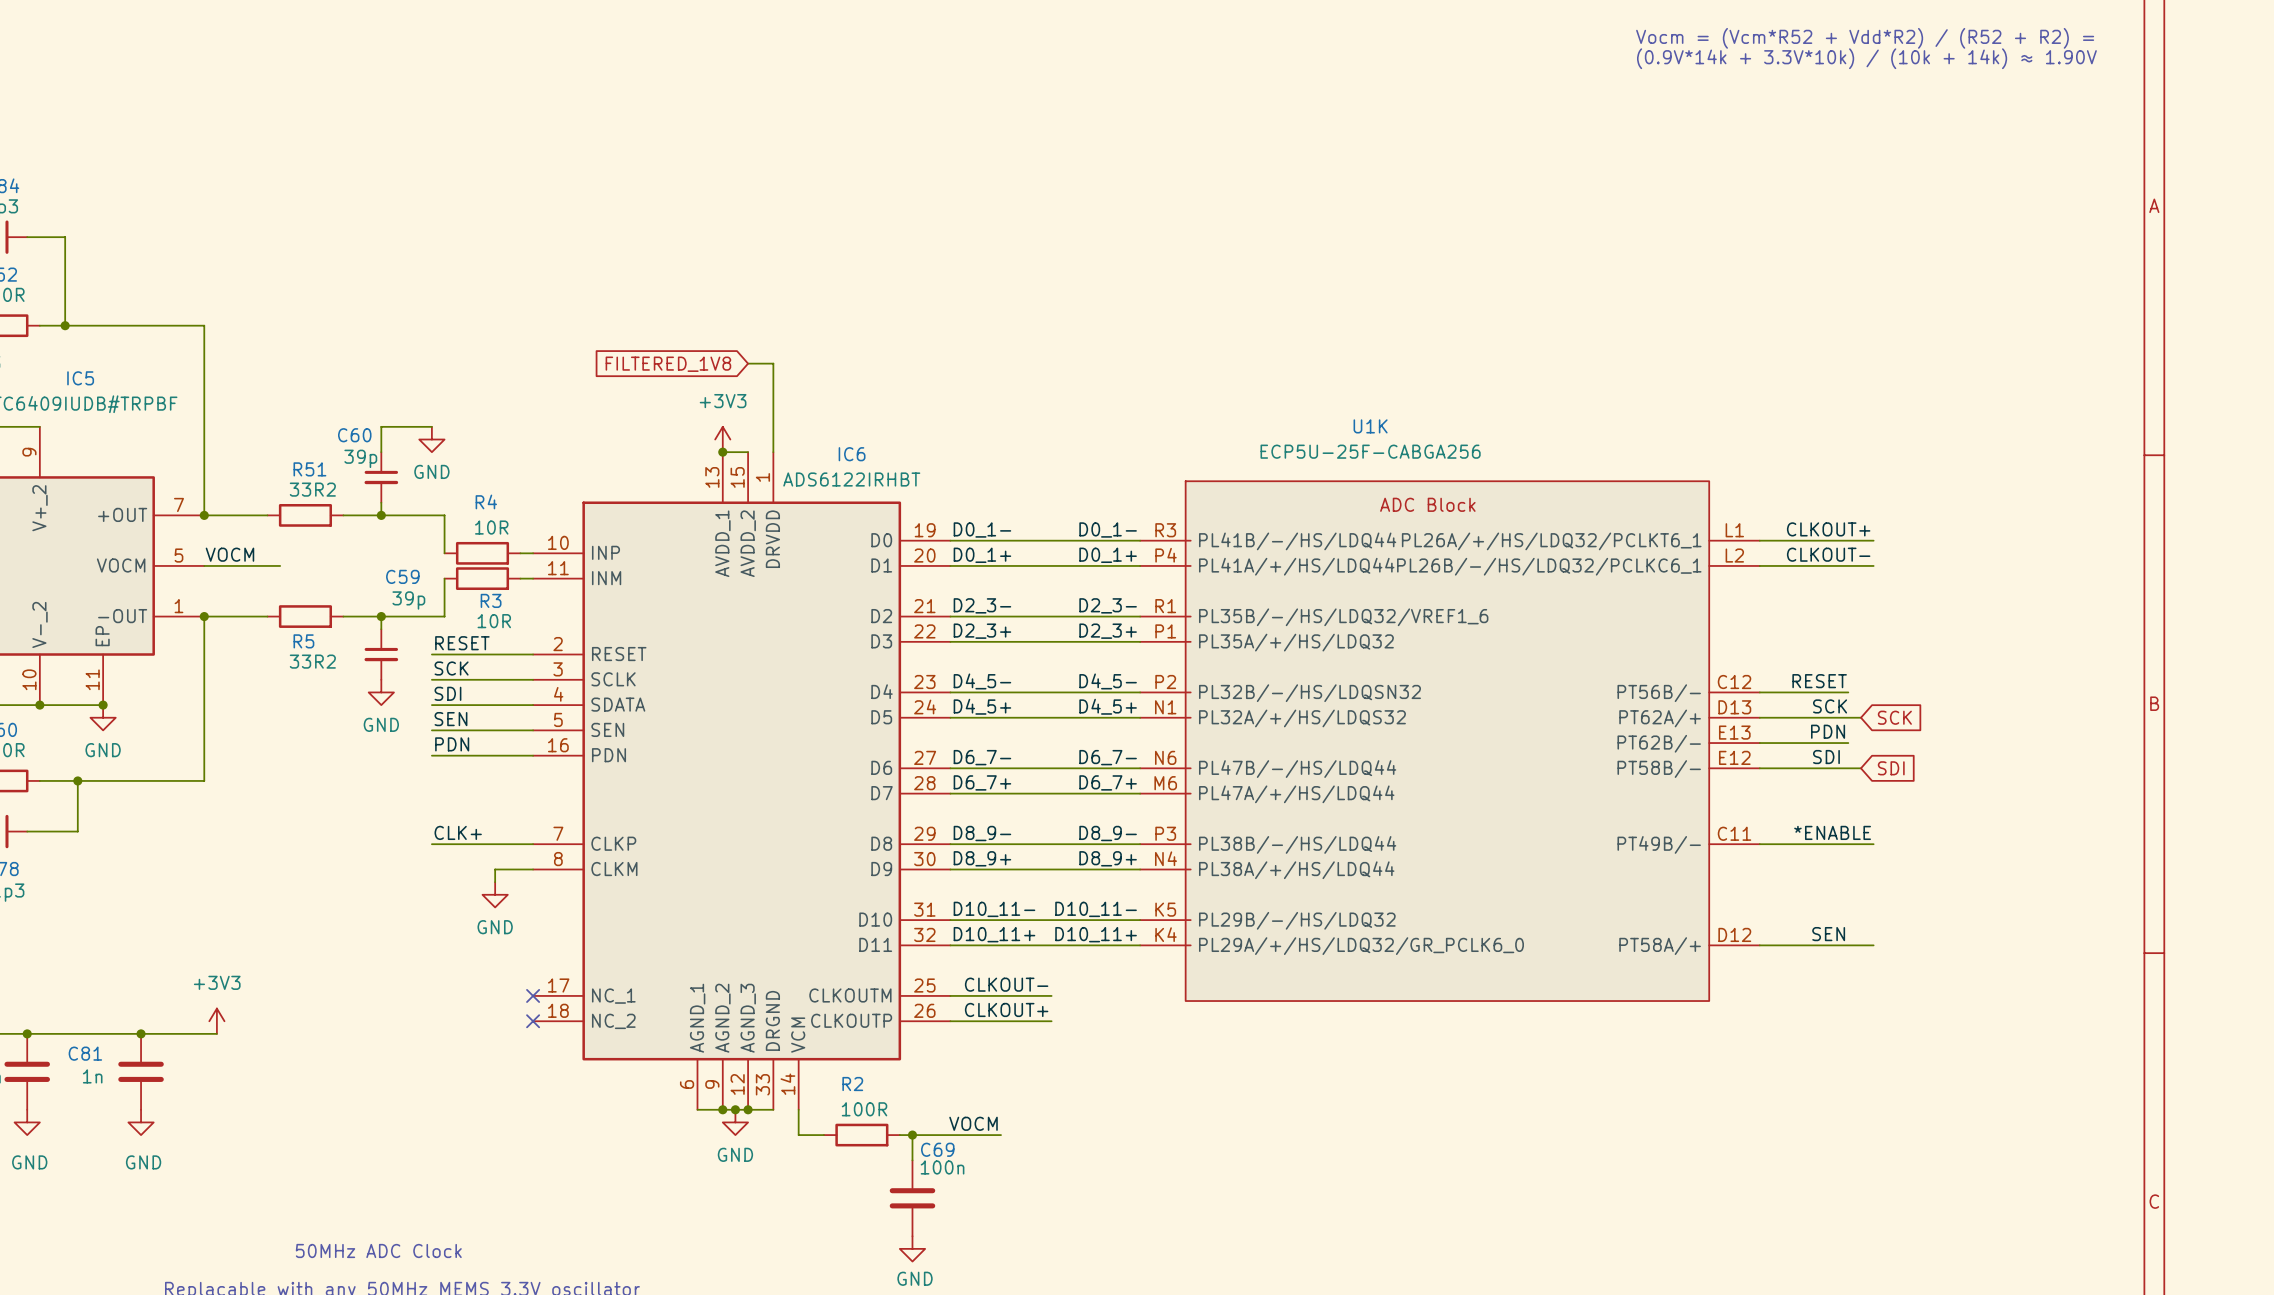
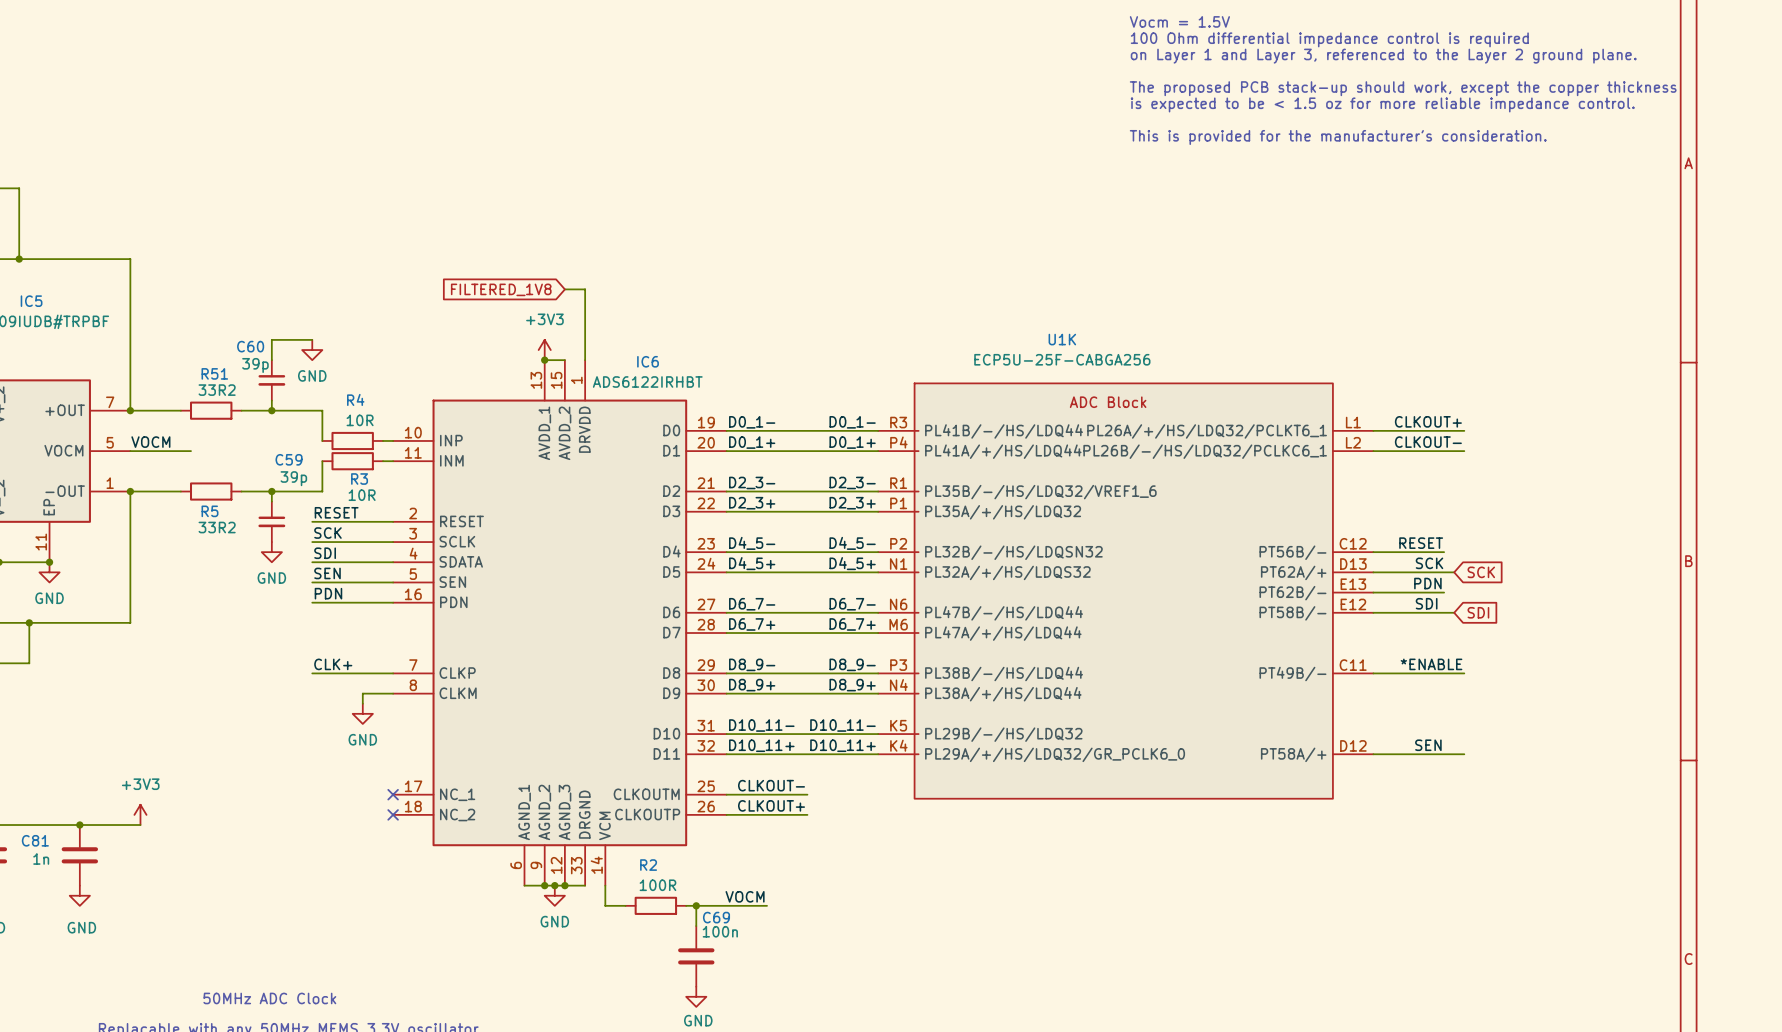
text: none -> Vocm = 1.5V (1179, 21)
text: Vocm = (Vcm*R52 + Vdd*R2) / (R52 + R2) = (1865, 38) -> none
text: none -> 100 Ohm differential impedance control is required (1329, 39)
text: (0.9V*14k + 3.3V*10k) / (10k + 14k) ≈ 1.90V (1866, 58) -> none
text: none -> on Layer 1 and Layer 3, referenced to the Layer 2 ground plane. (1383, 56)
text: none -> The proposed PCB stack-up should work, except the copper thickness (1403, 88)
text: none -> is expected to be < 1.5 oz for more reliable impedance control. (1382, 104)
text: none -> This is provided for the manufacturer's consideration. (1338, 137)

